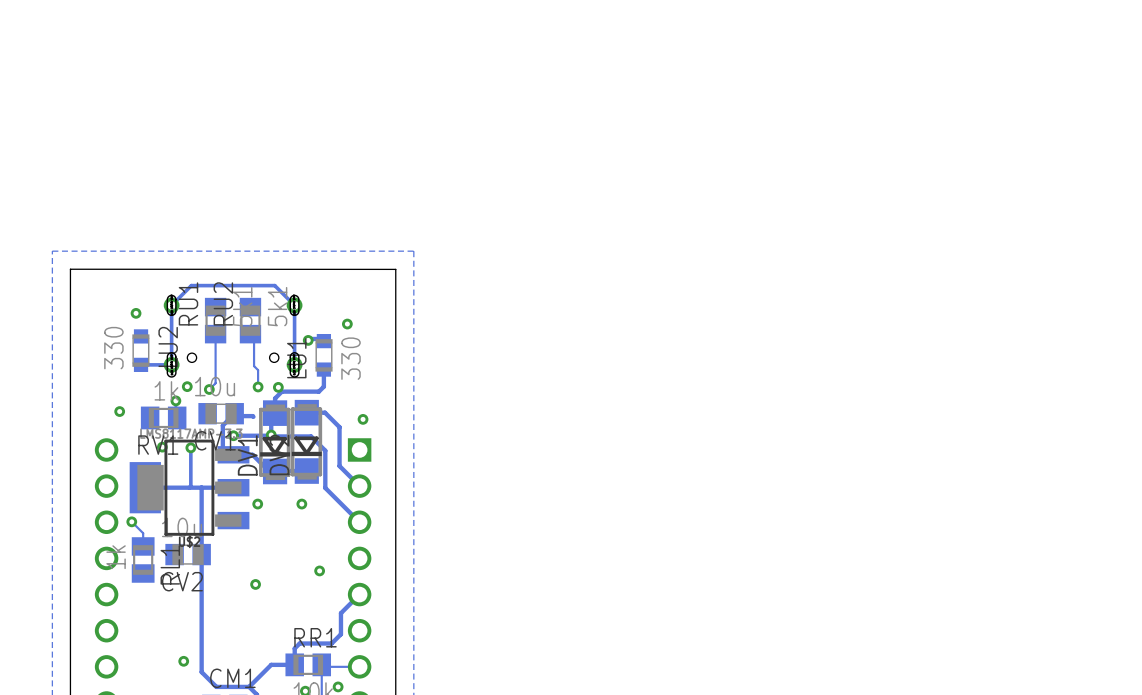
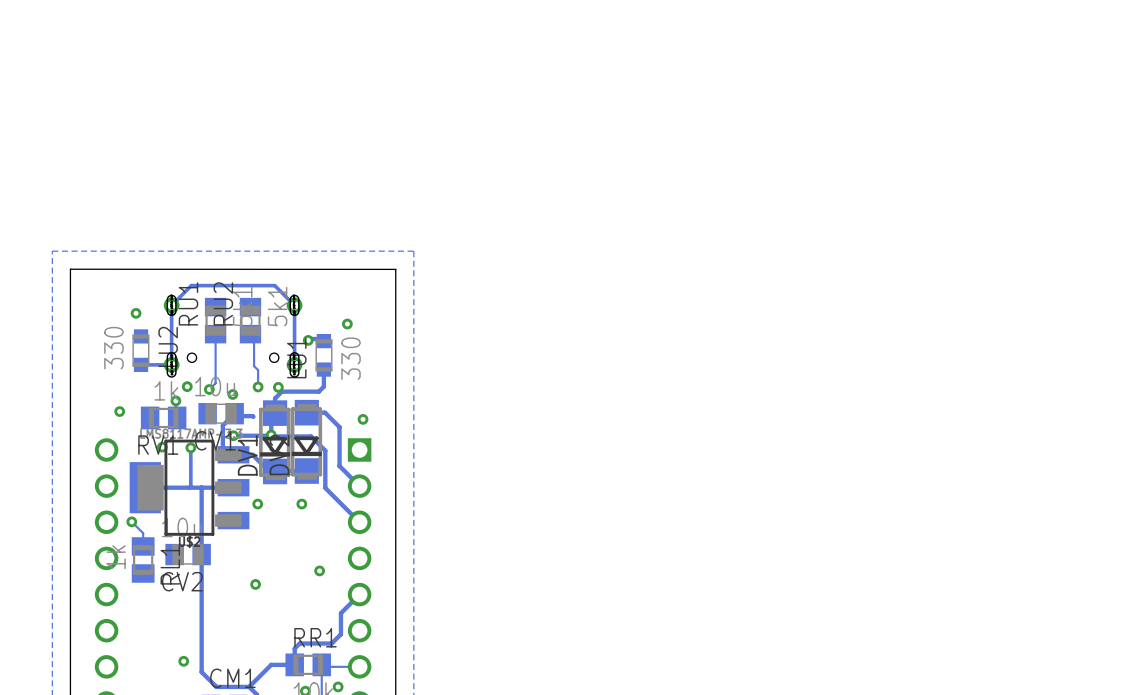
via: none -> (232, 394)

